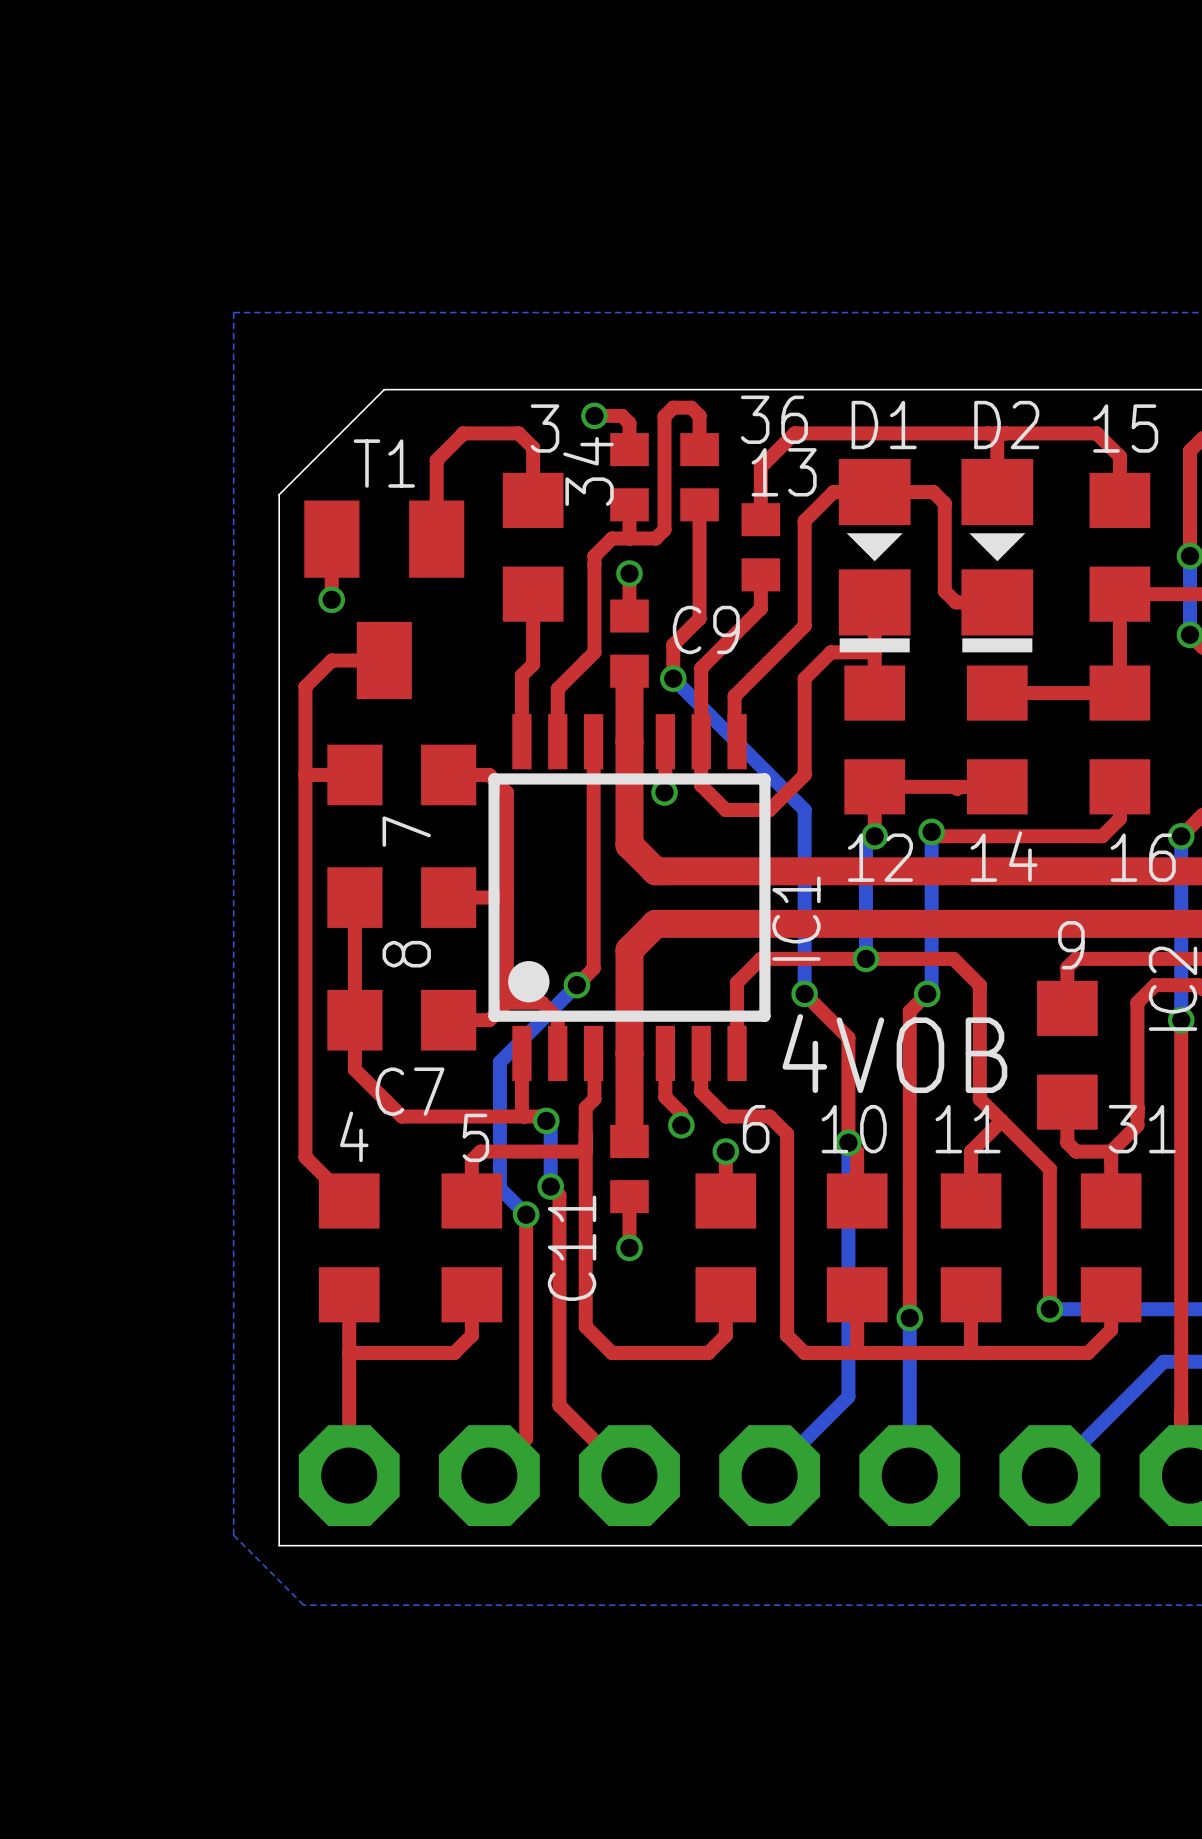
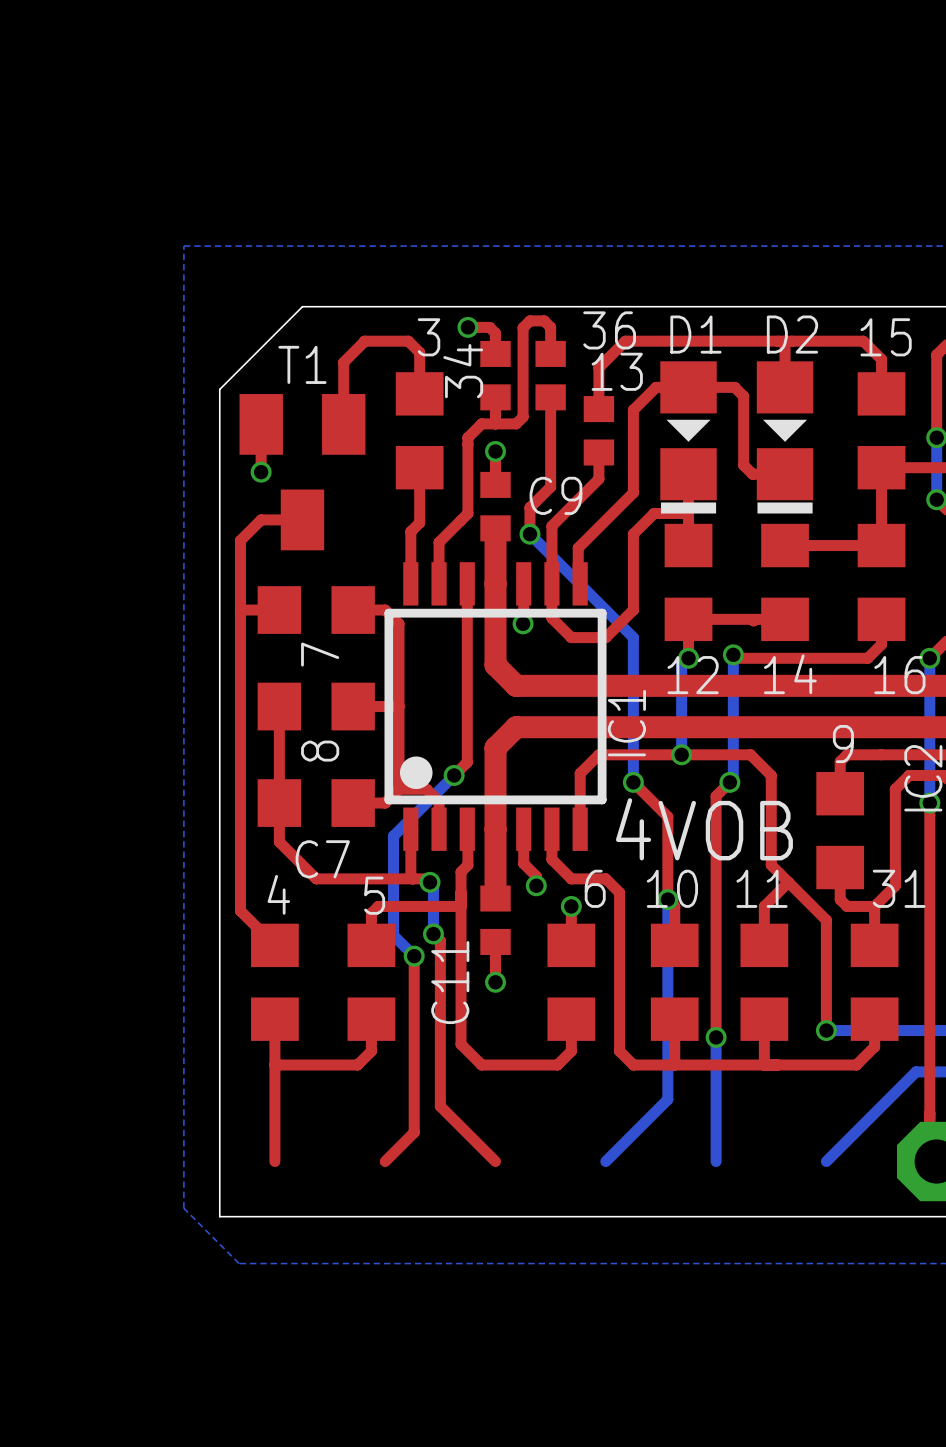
part: (349, 1475) -> none
part: (489, 1475) -> none
part: (629, 1475) -> none
part: (769, 1475) -> none
part: (909, 1475) -> none
part: (1049, 1475) -> none

